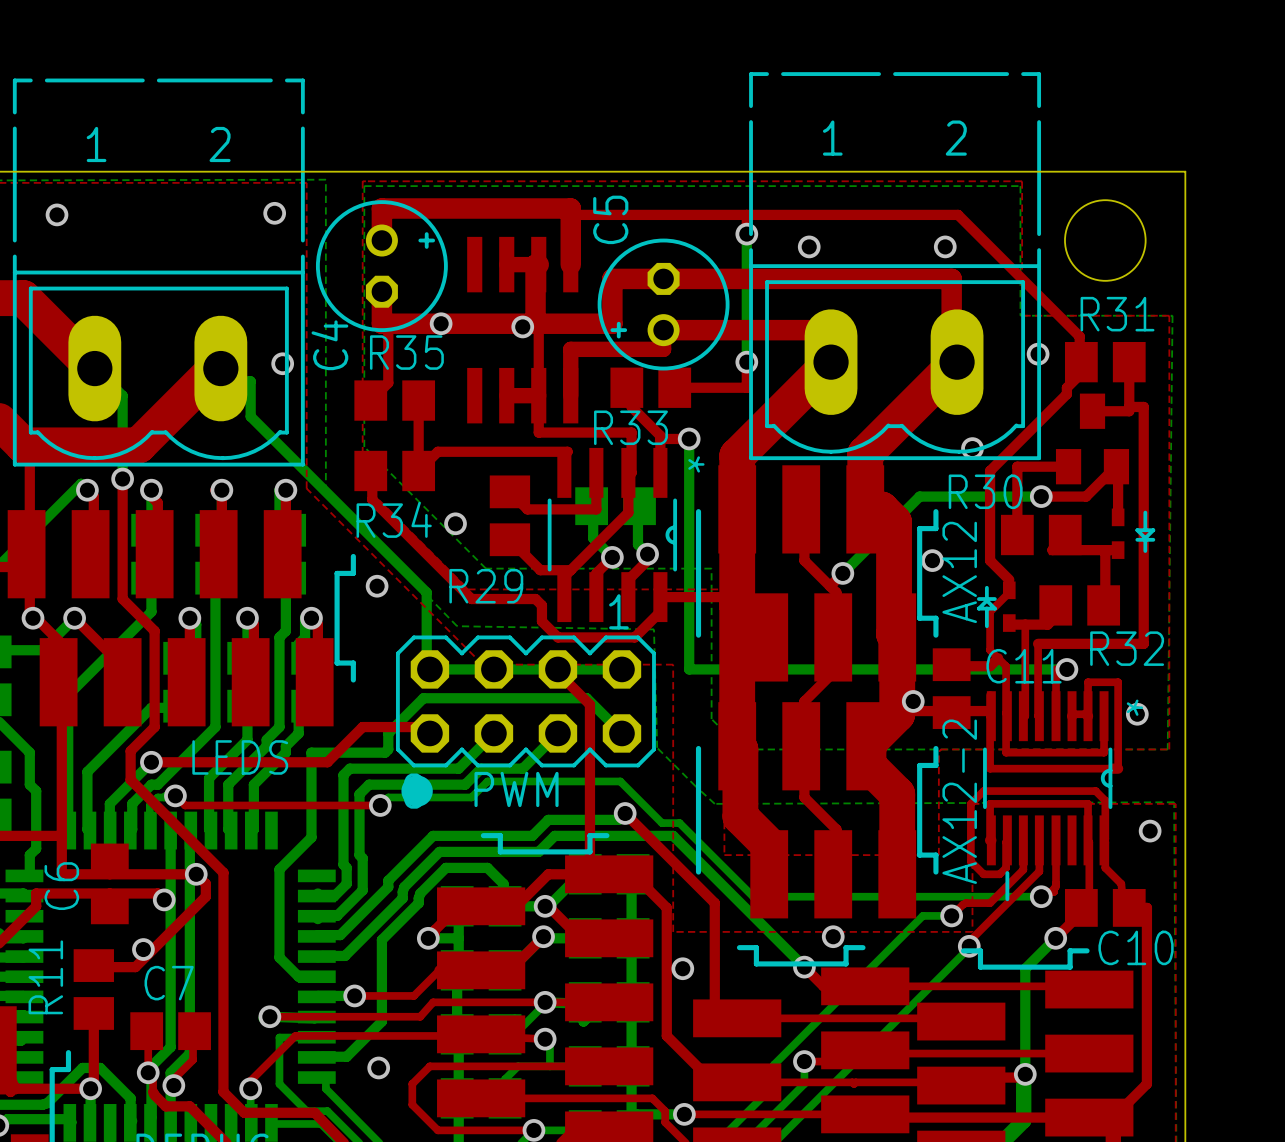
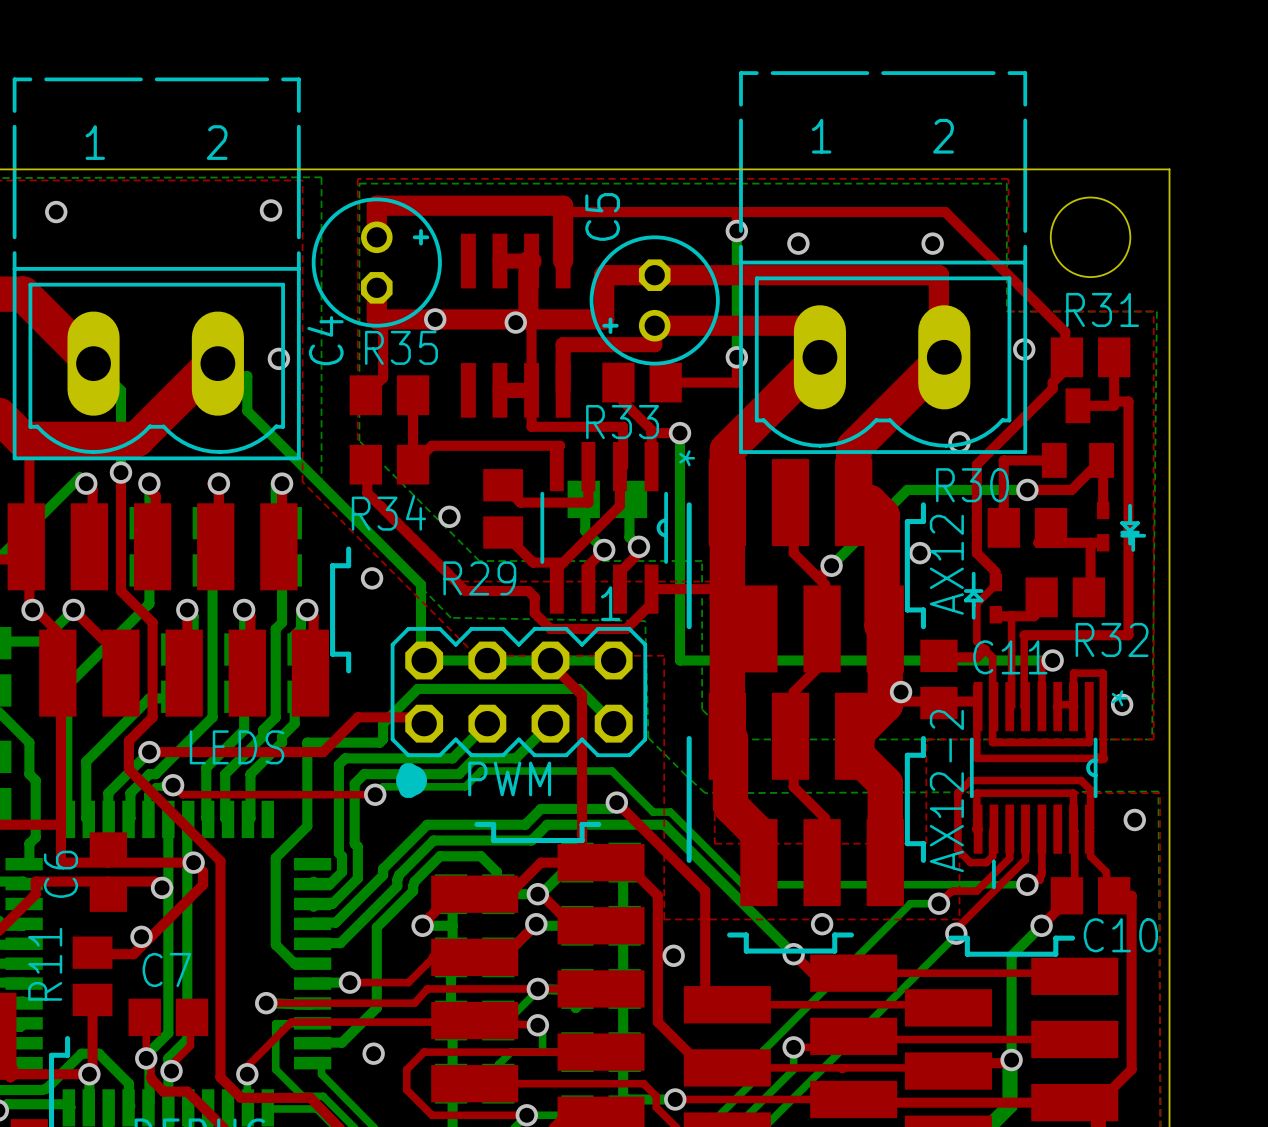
line: none -> (1133, 534) (1133, 549)
line: none -> (1122, 535) (1144, 535)
line: none -> (973, 573) (973, 579)

